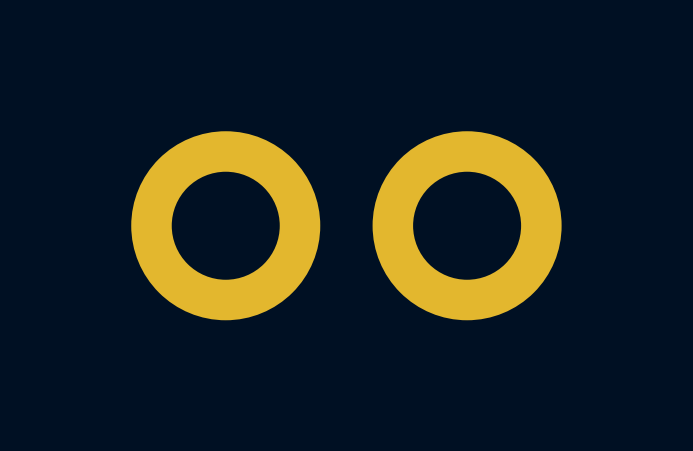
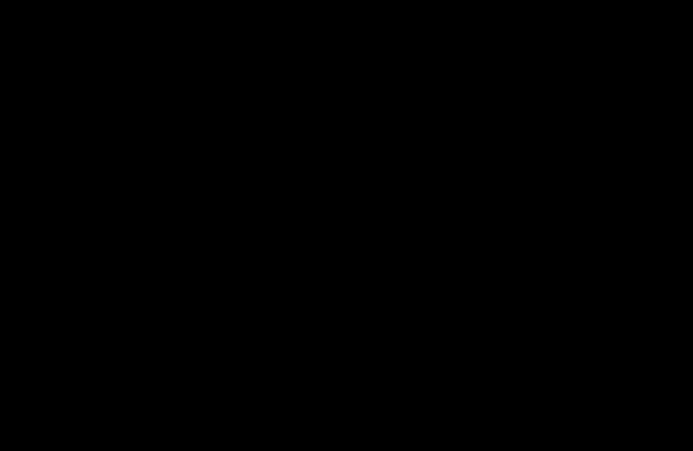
part: (225, 225) -> none
part: (467, 225) -> none

